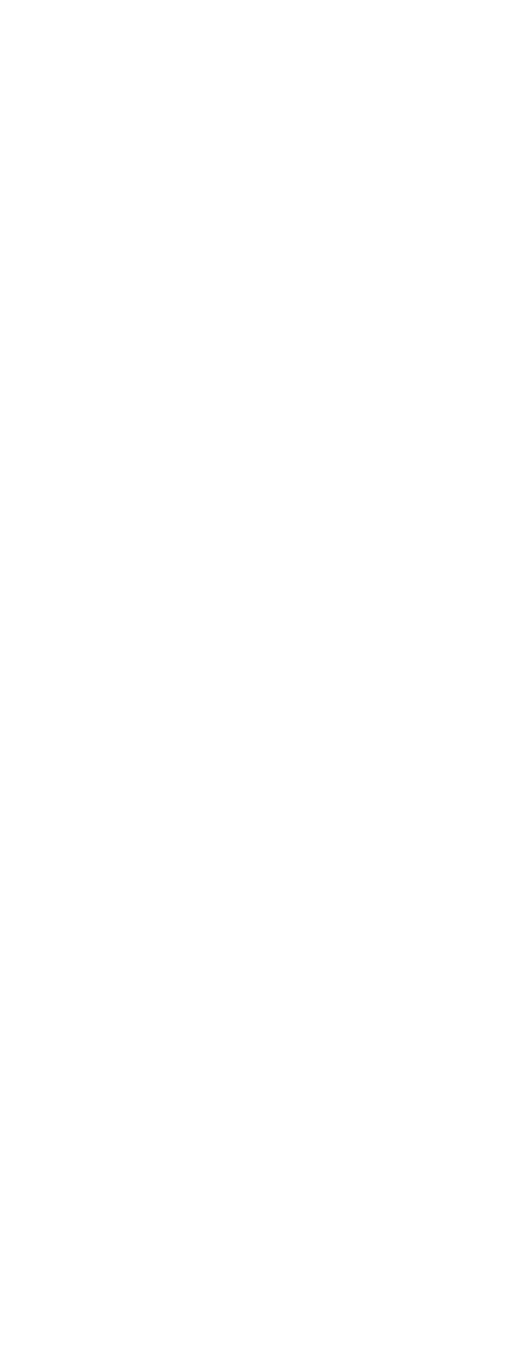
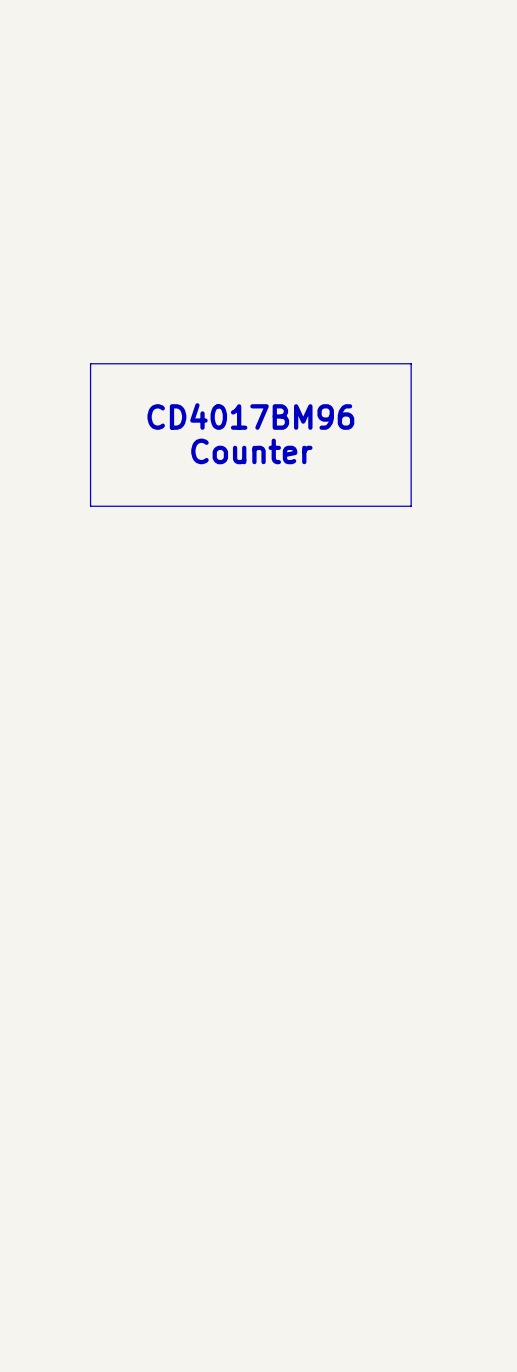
line: none -> (90, 363) (90, 506) (411, 506) (411, 363) (90, 363)
text: none -> CD4017BM96 (250, 416)
text: none -> Counter (251, 451)

